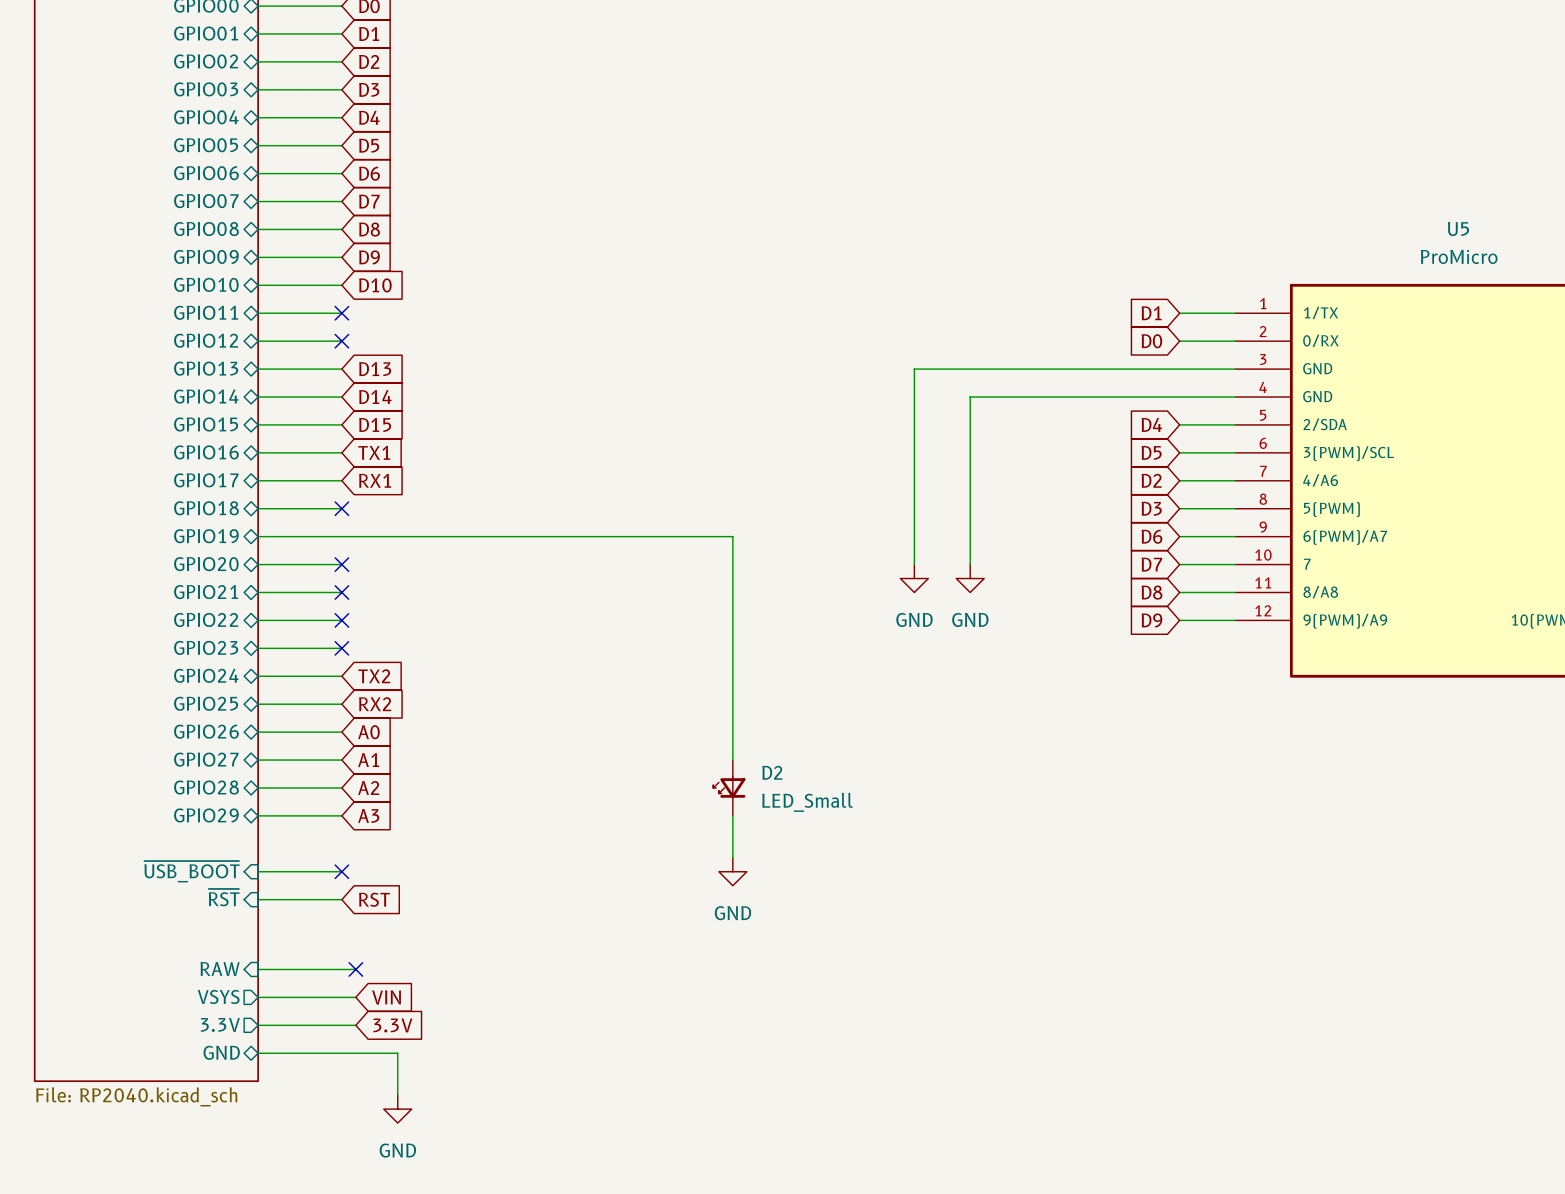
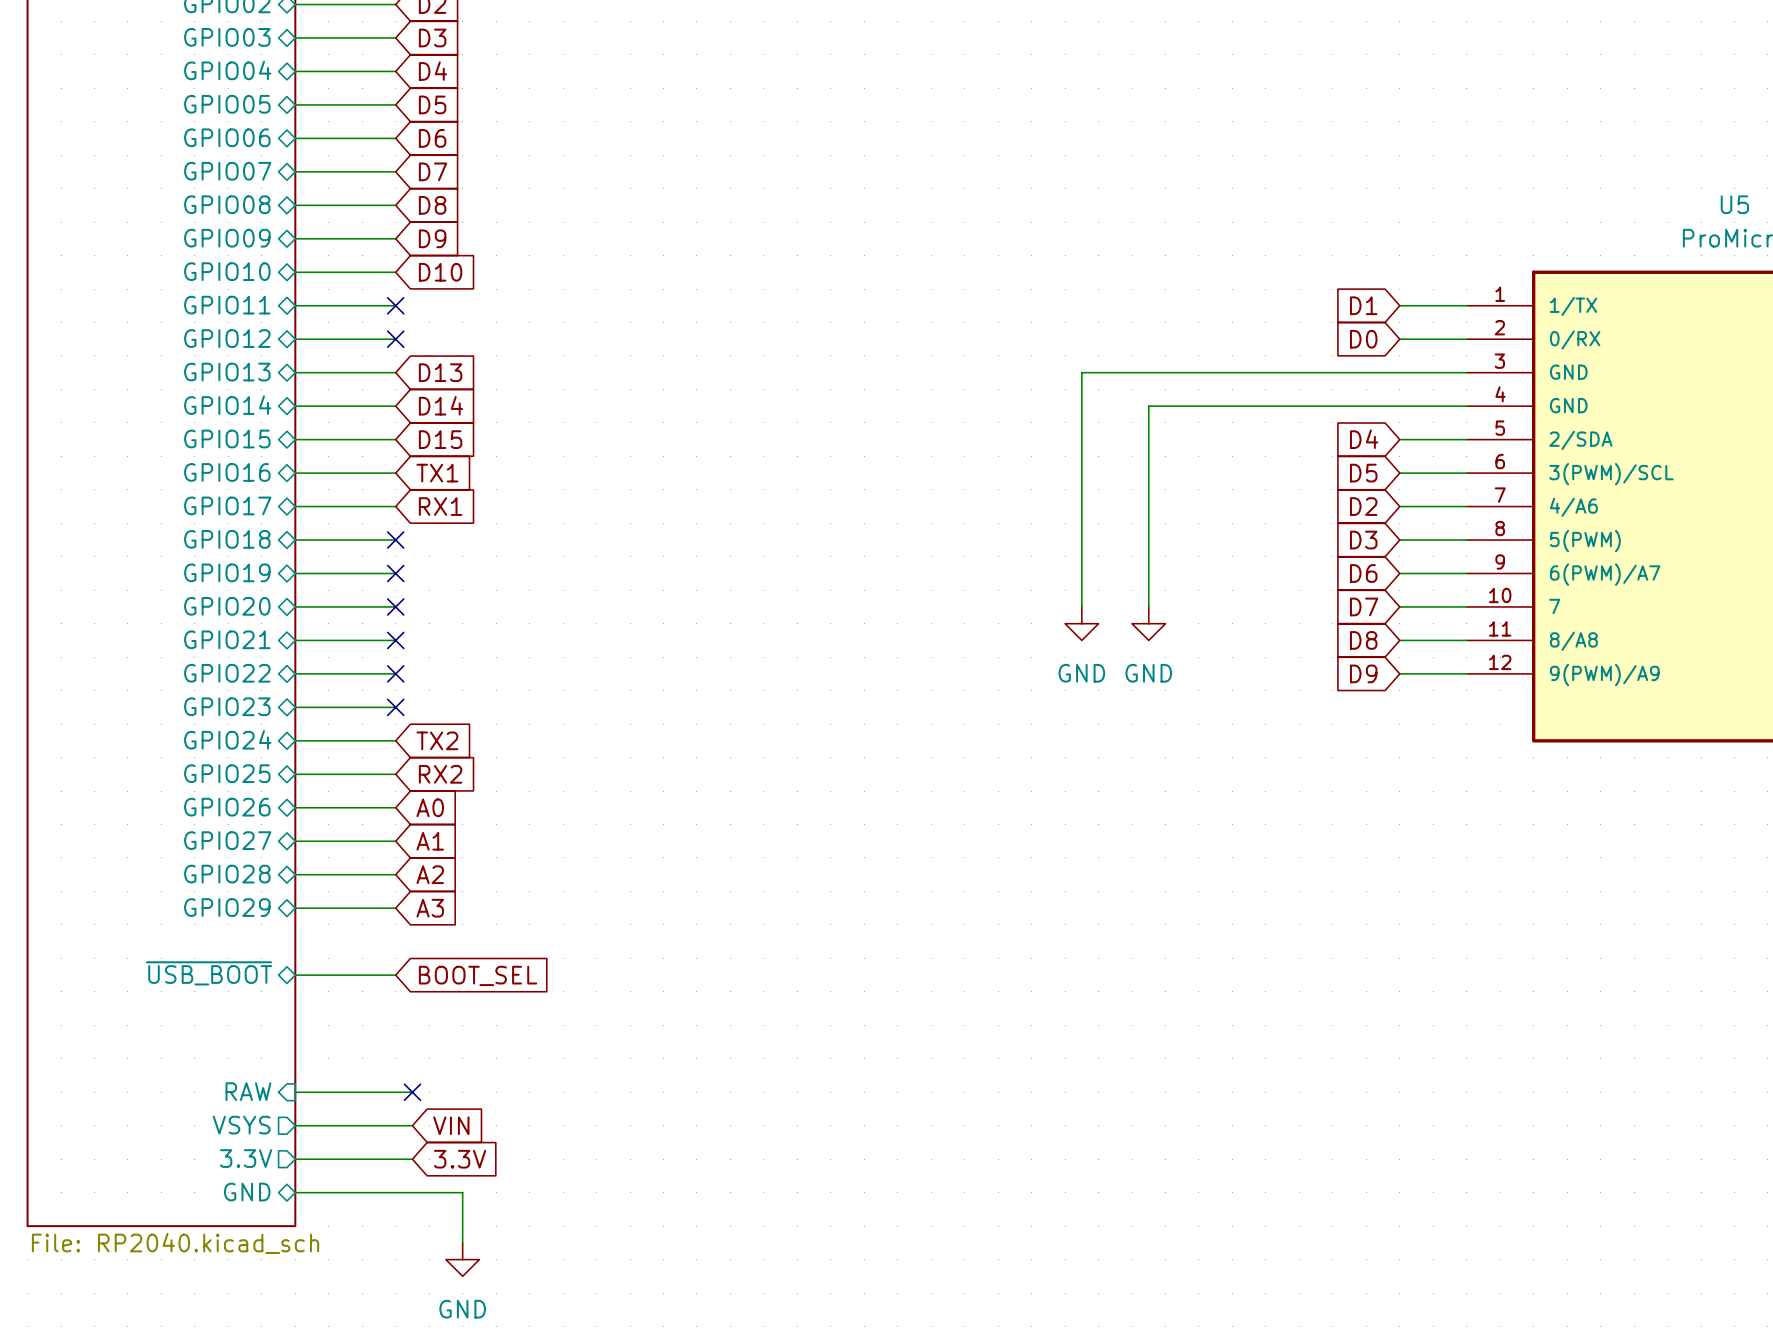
wire: (341, 536) (732, 536) (732, 760) -> none
no-connect mark: none -> (395, 573)
D2: LED_Small (729, 787) -> none
wire: (732, 815) (732, 857) -> none
sheet pin shape: input (191, 871) -> bidirectional (209, 973)
no-connect mark: (341, 871) -> none
power symbol: GND (732, 871) -> none
global label: none -> BOOT_SEL (478, 975)
sheet pin: ~{RST} (224, 897) -> none
wire: (258, 899) (341, 899) -> none
global label: RST (374, 899) -> none

